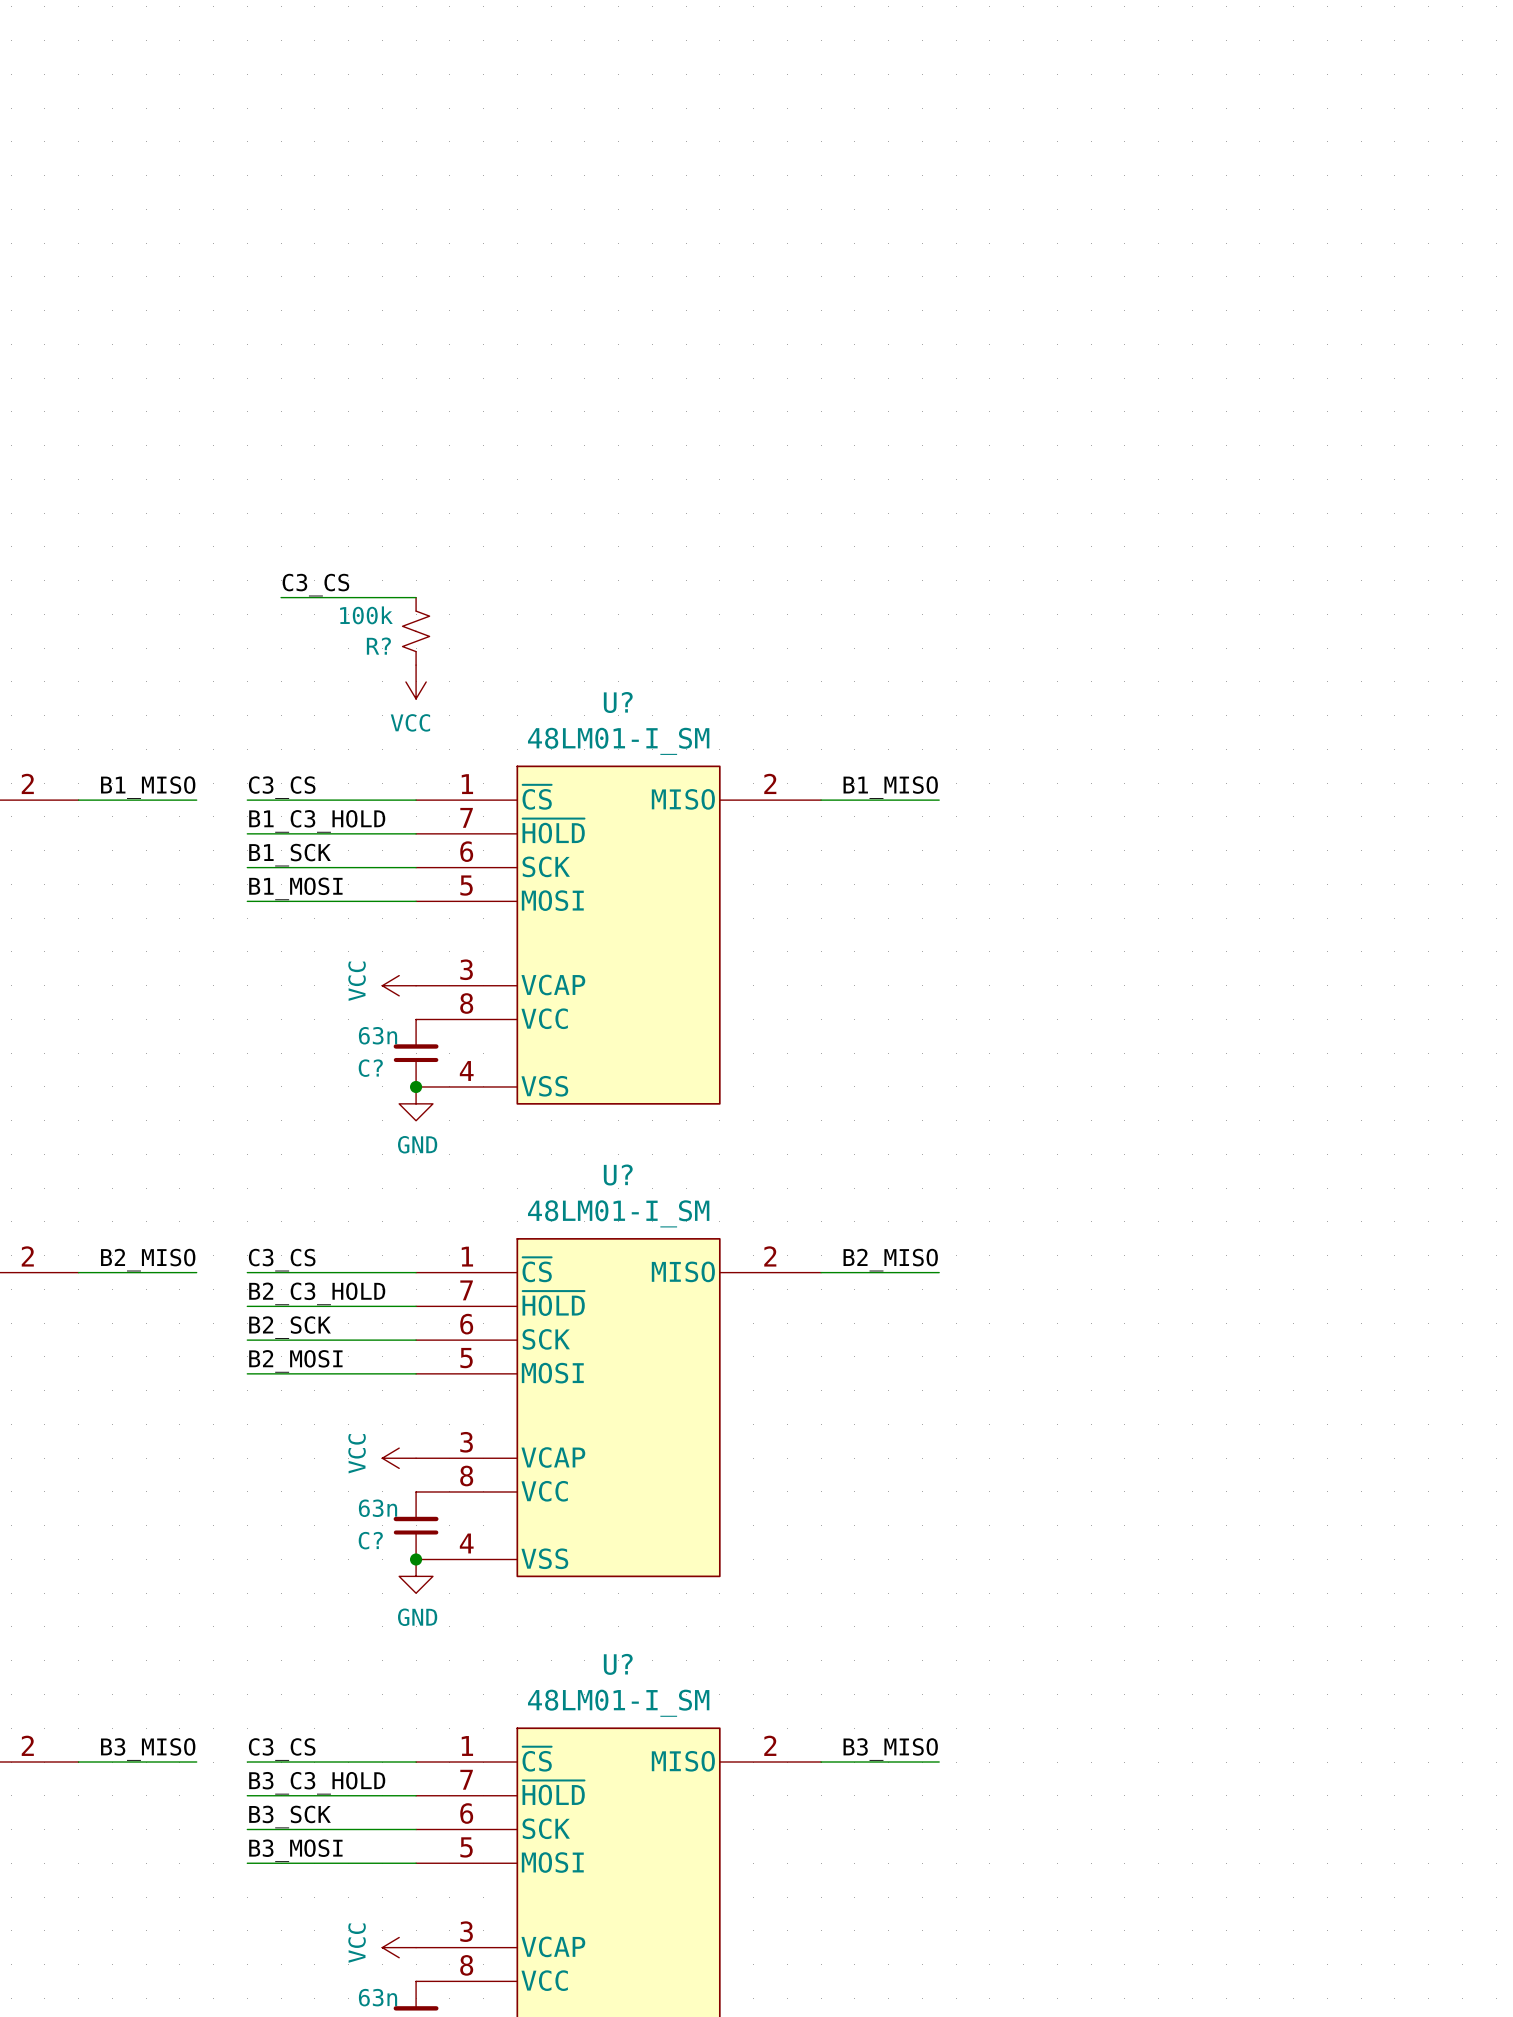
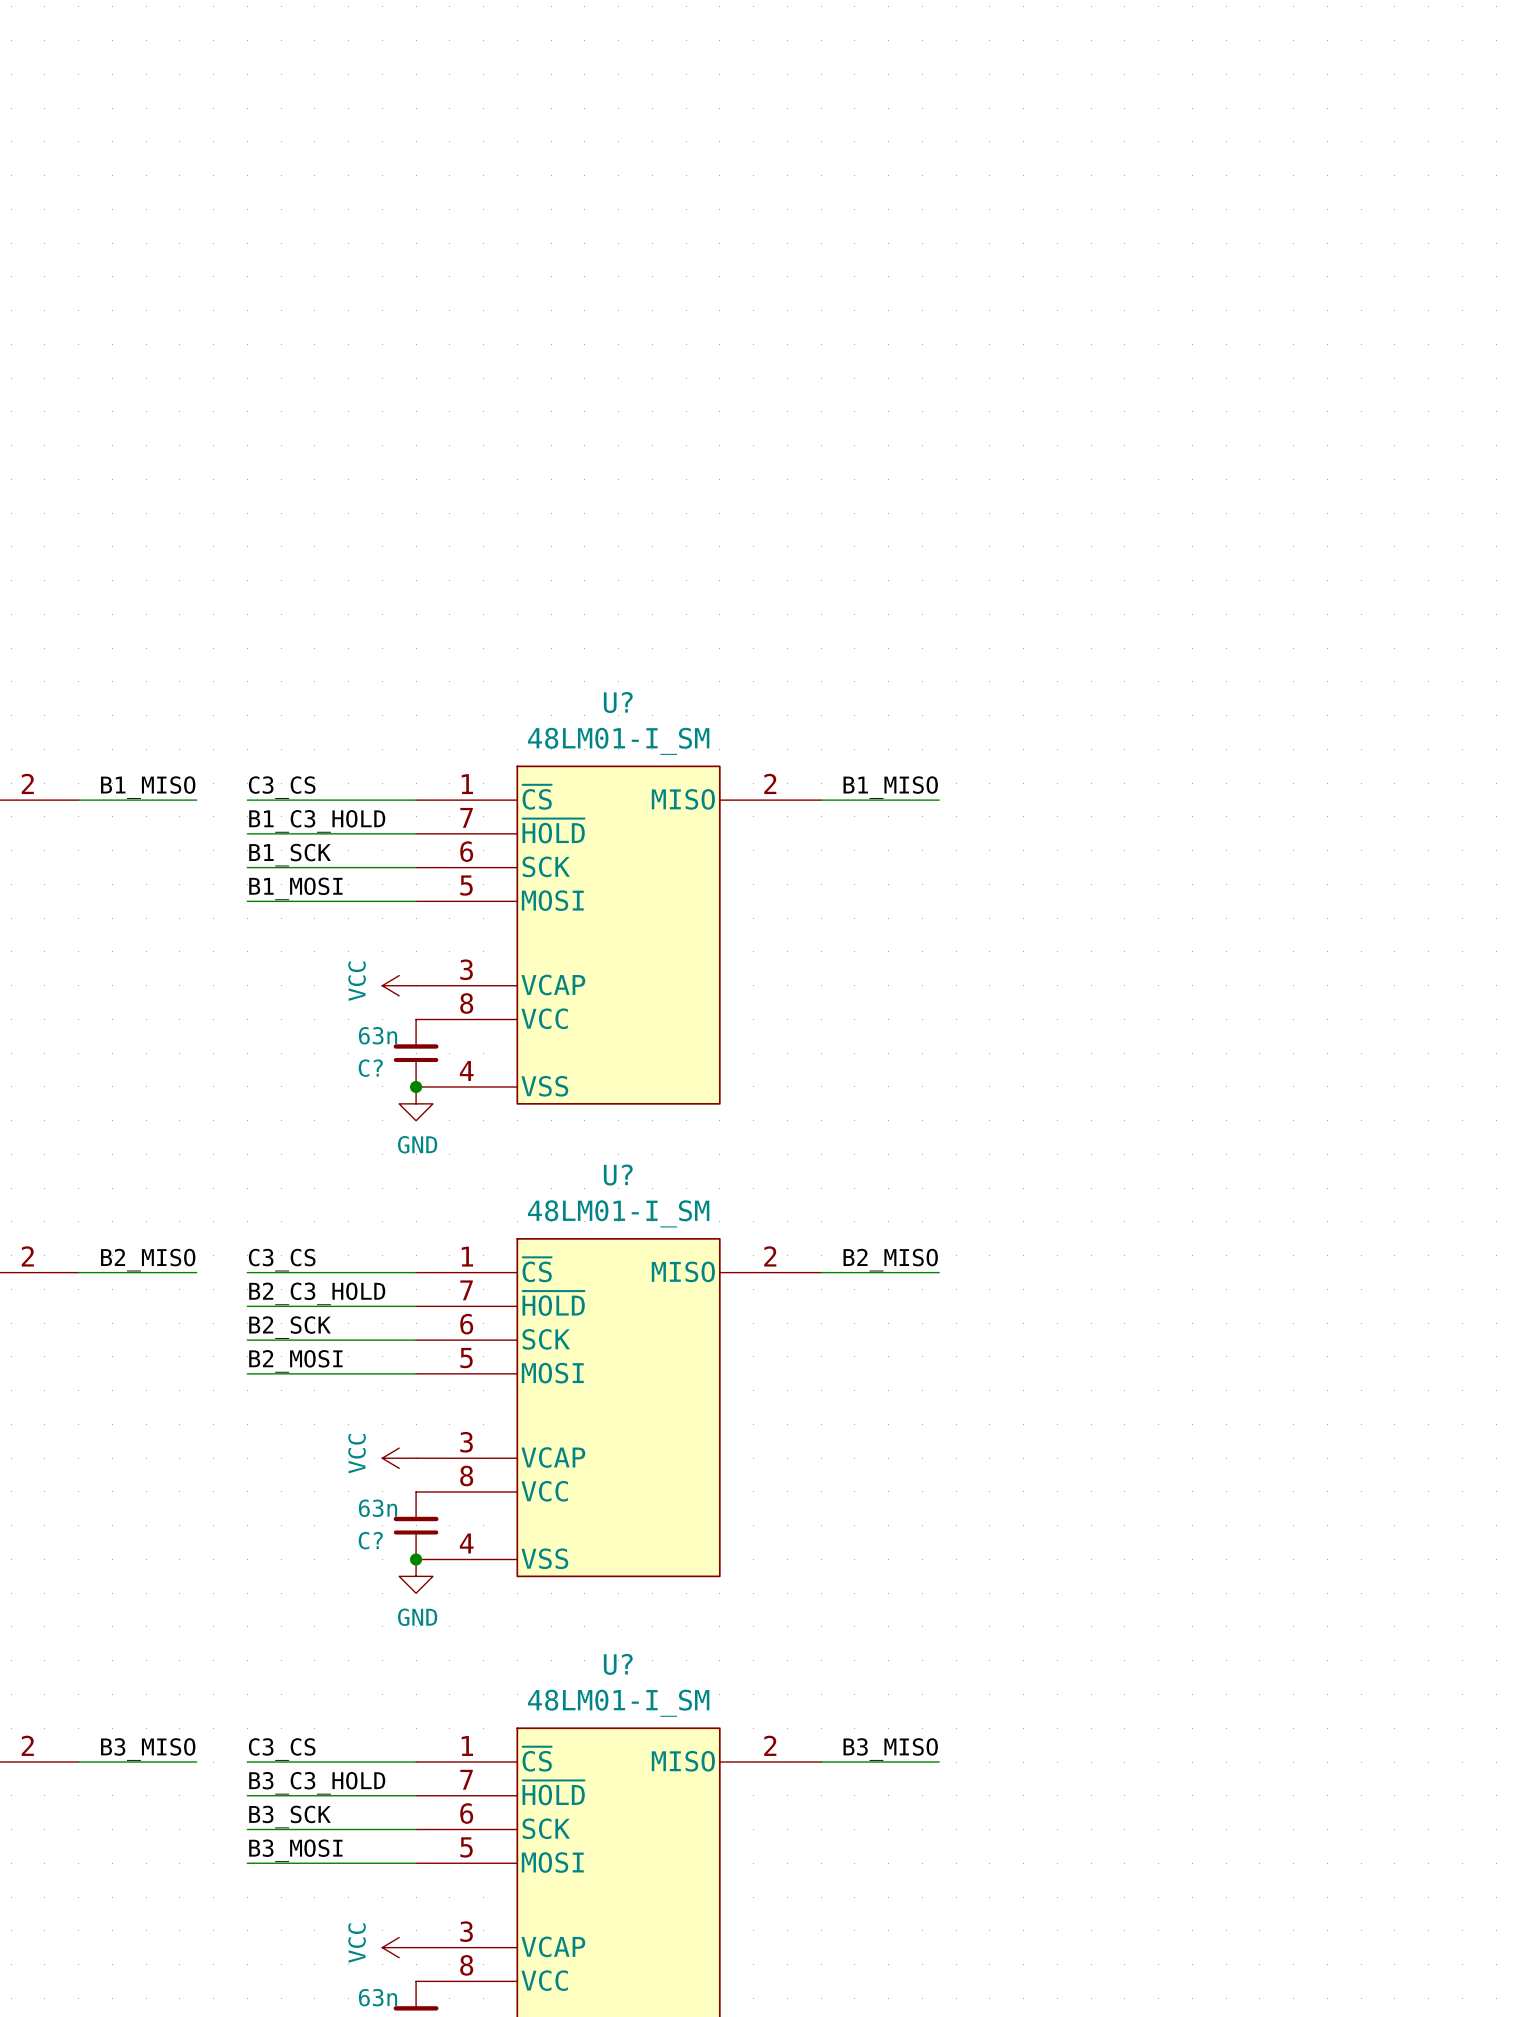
label: C3_CS (315, 585) -> none
wire: (281, 597) (416, 597) -> none
R?: 100k (416, 631) -> none
power symbol: VCC (416, 681) -> none

